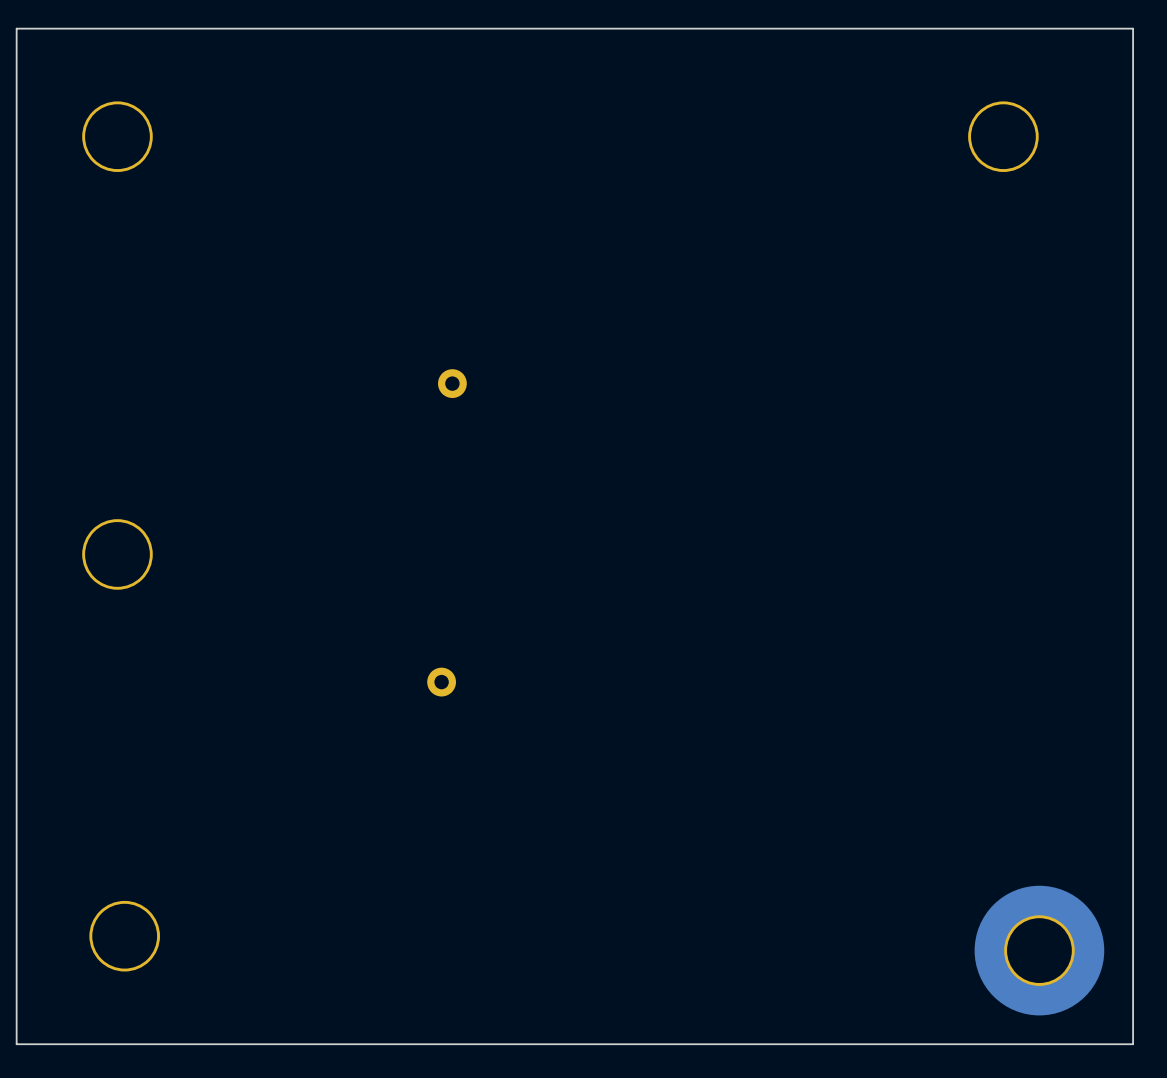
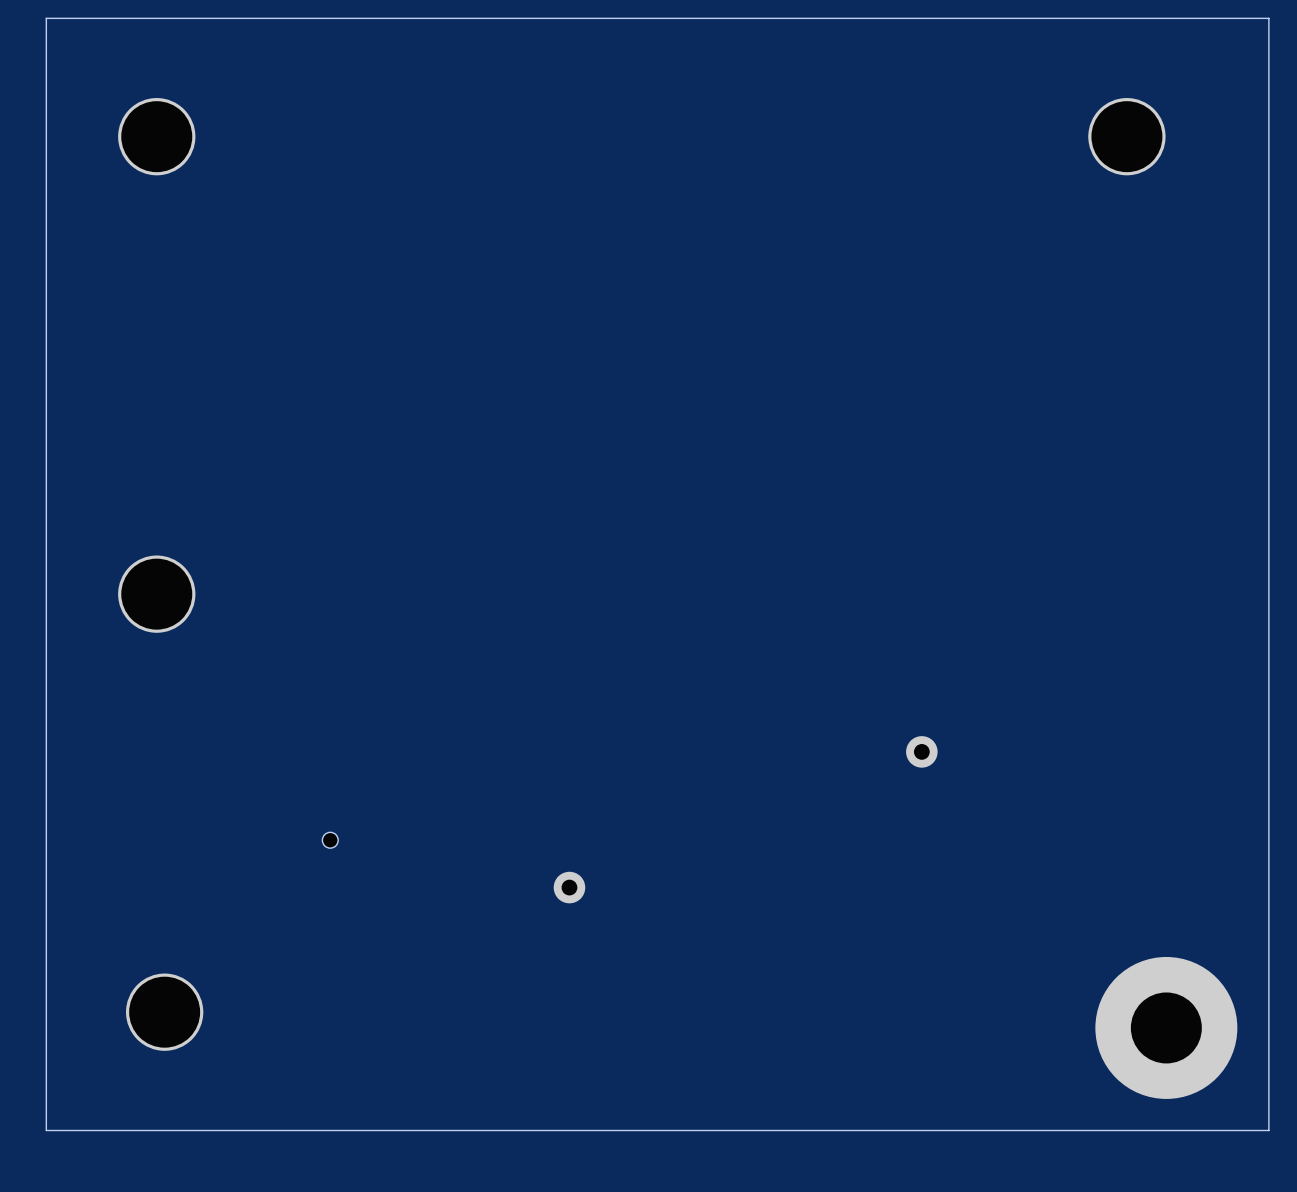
part: (452, 383) -> none
part position: (441, 682) -> (569, 887)
part: none -> (921, 751)
part: none -> (330, 840)

